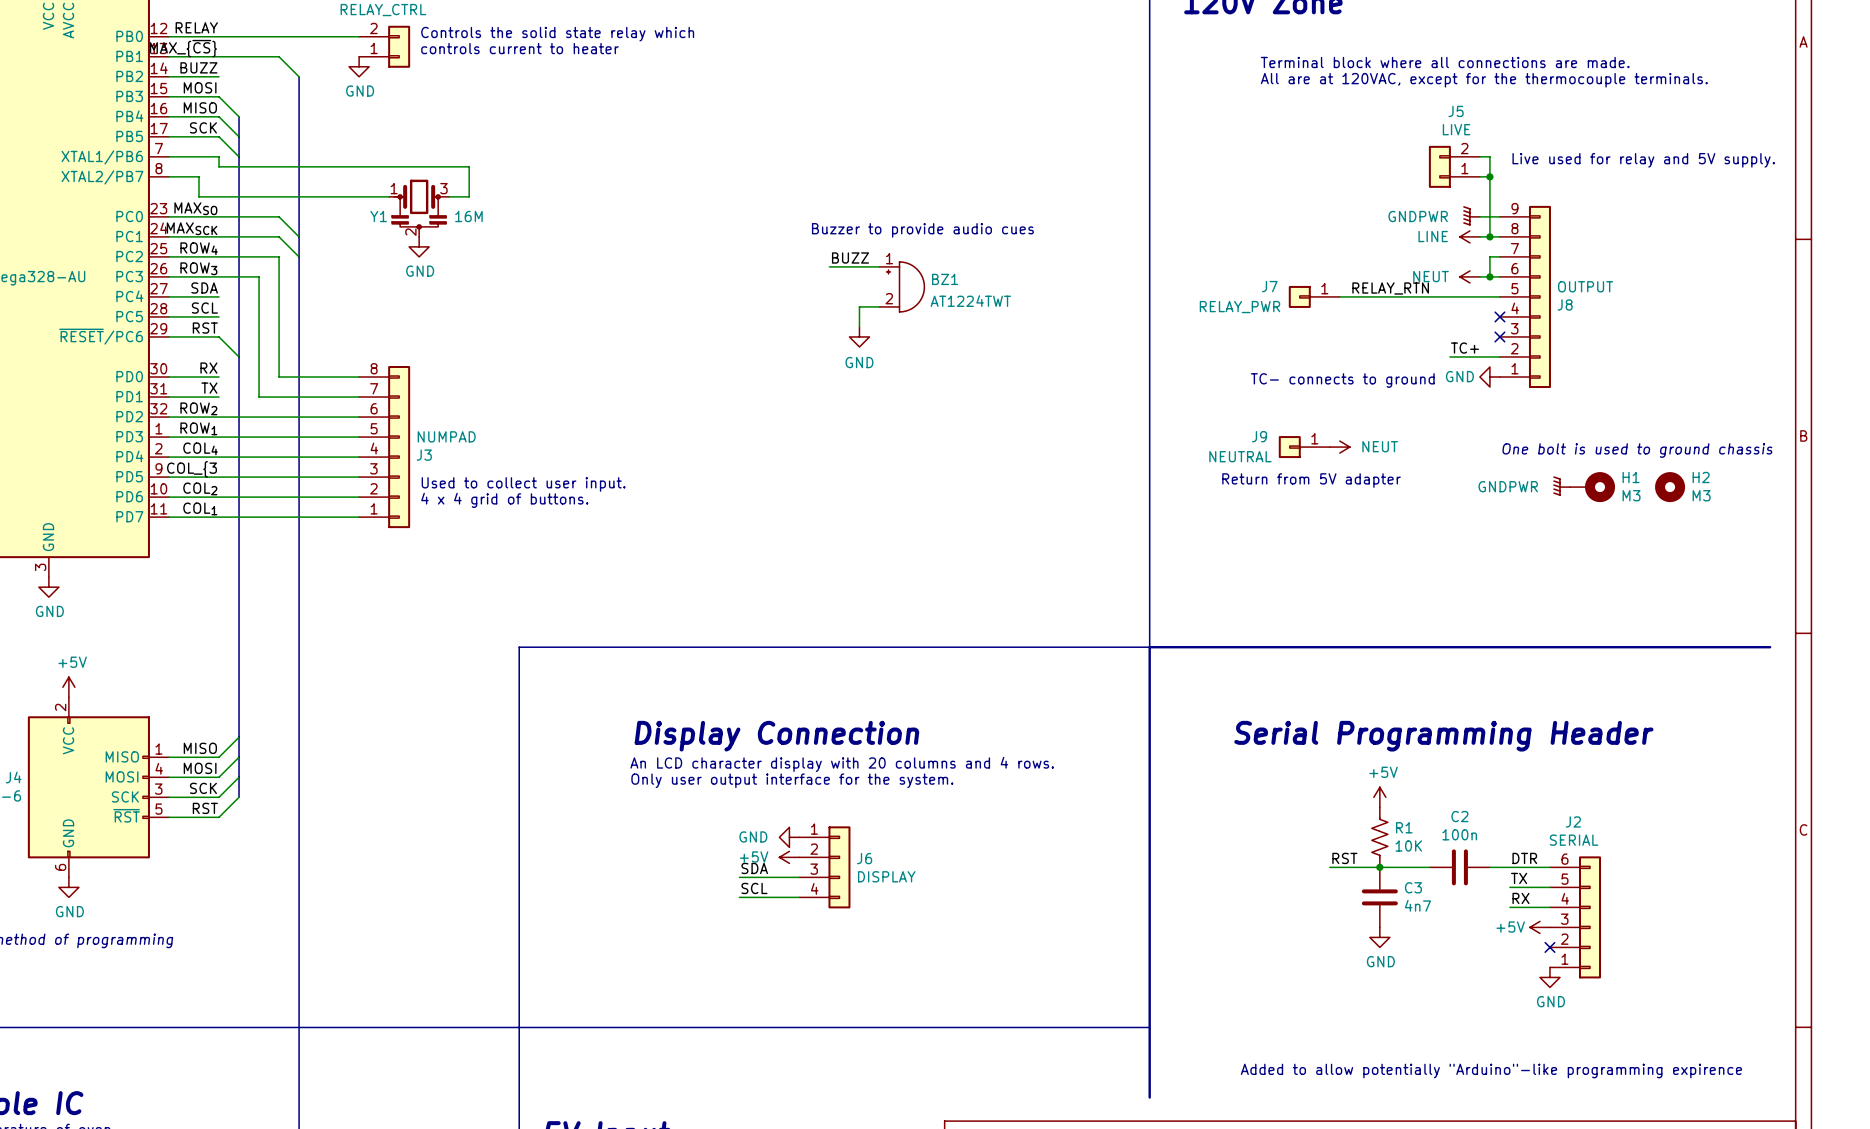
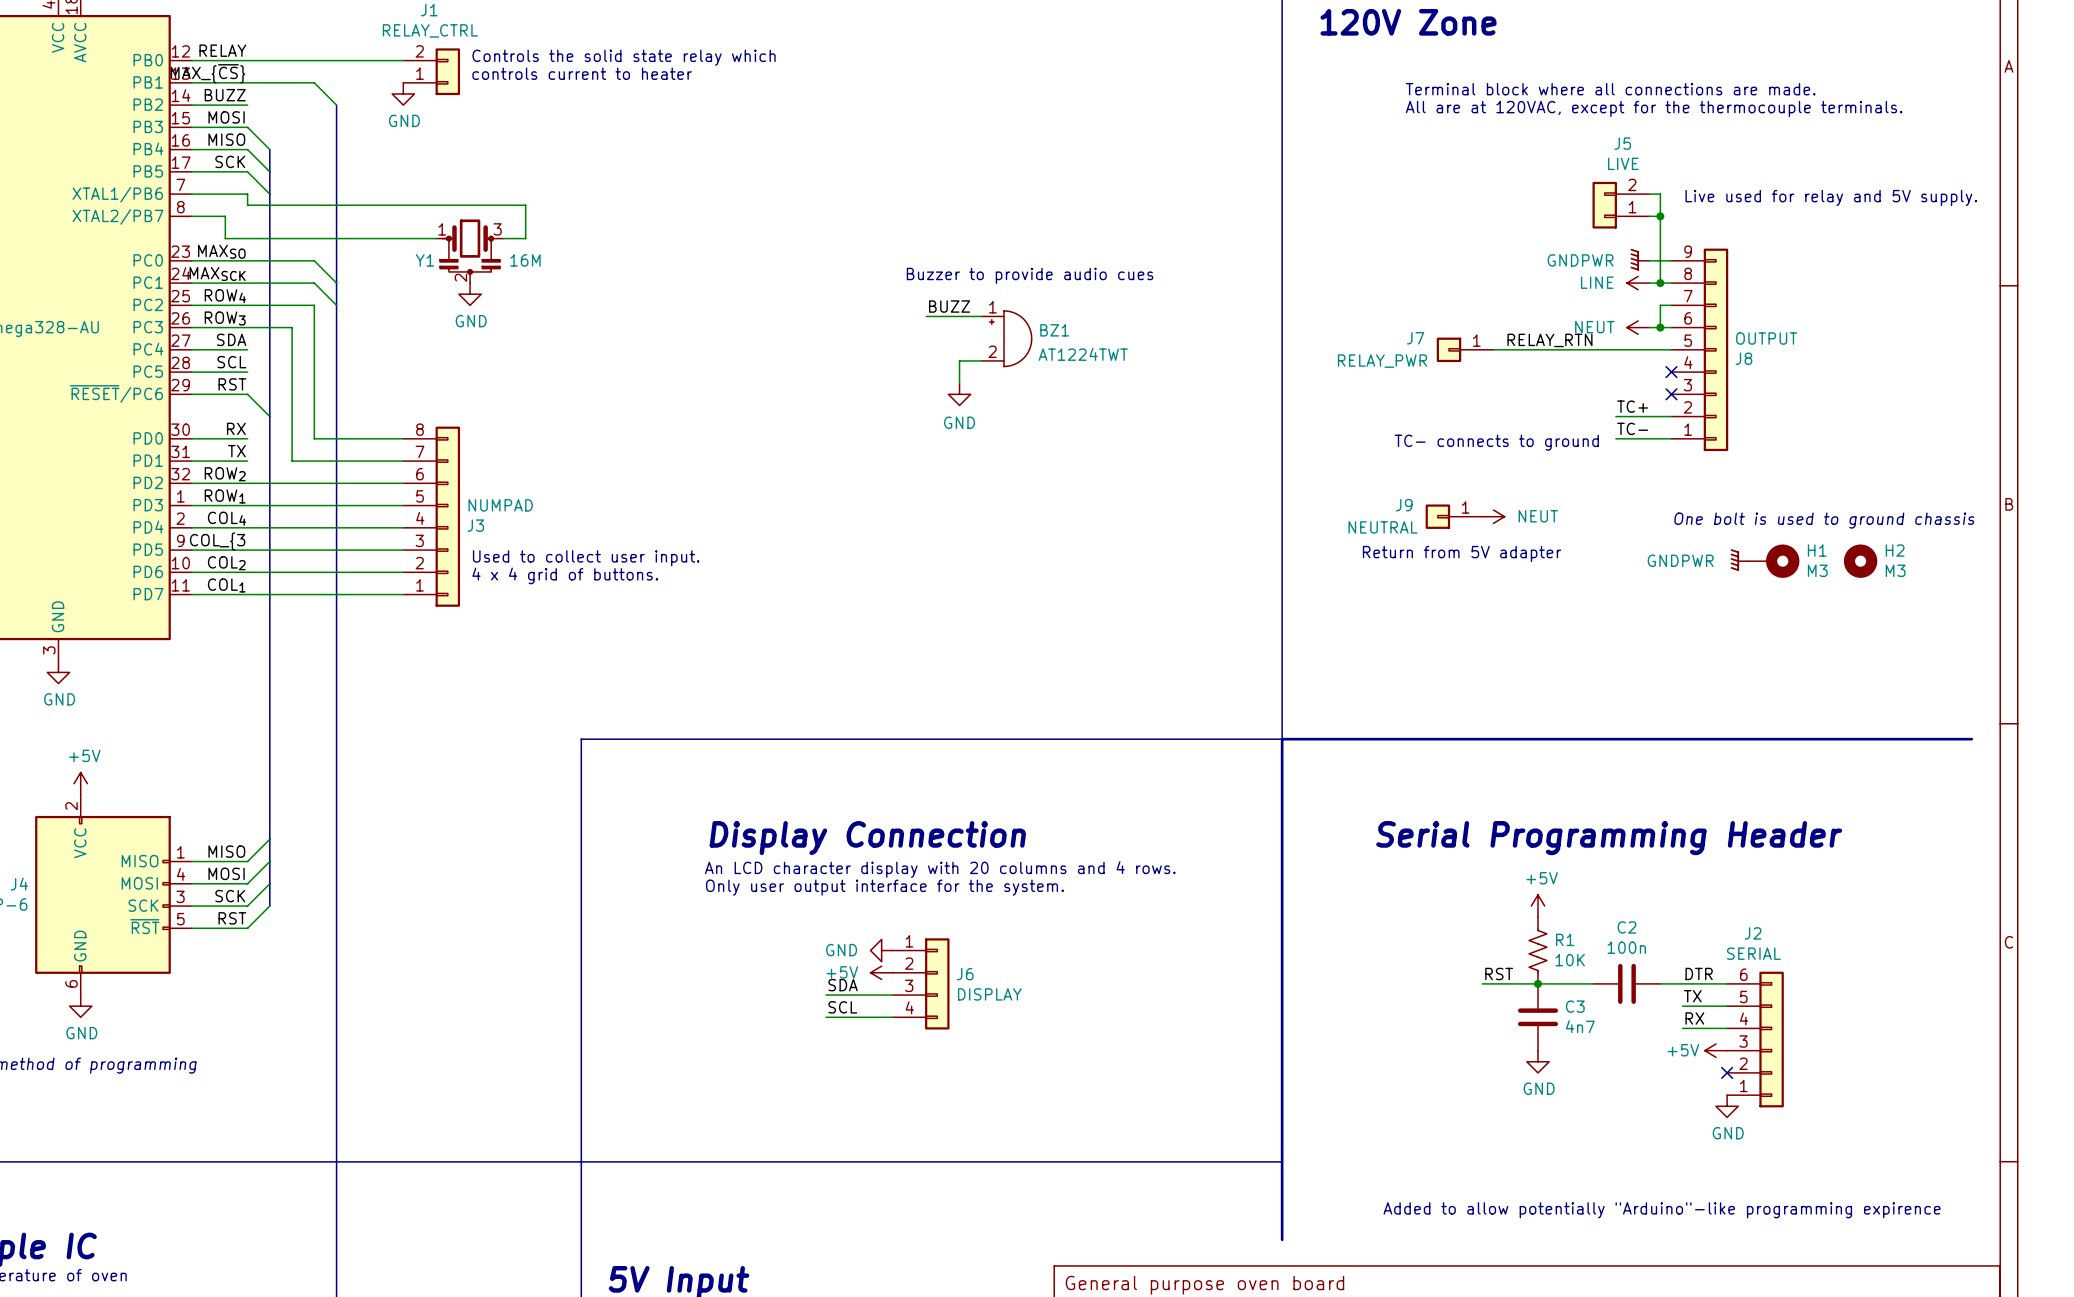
label: none -> TC- (1632, 428)
wire: none -> (1615, 438) (1671, 438)
power symbol: GND (1489, 377) -> none

